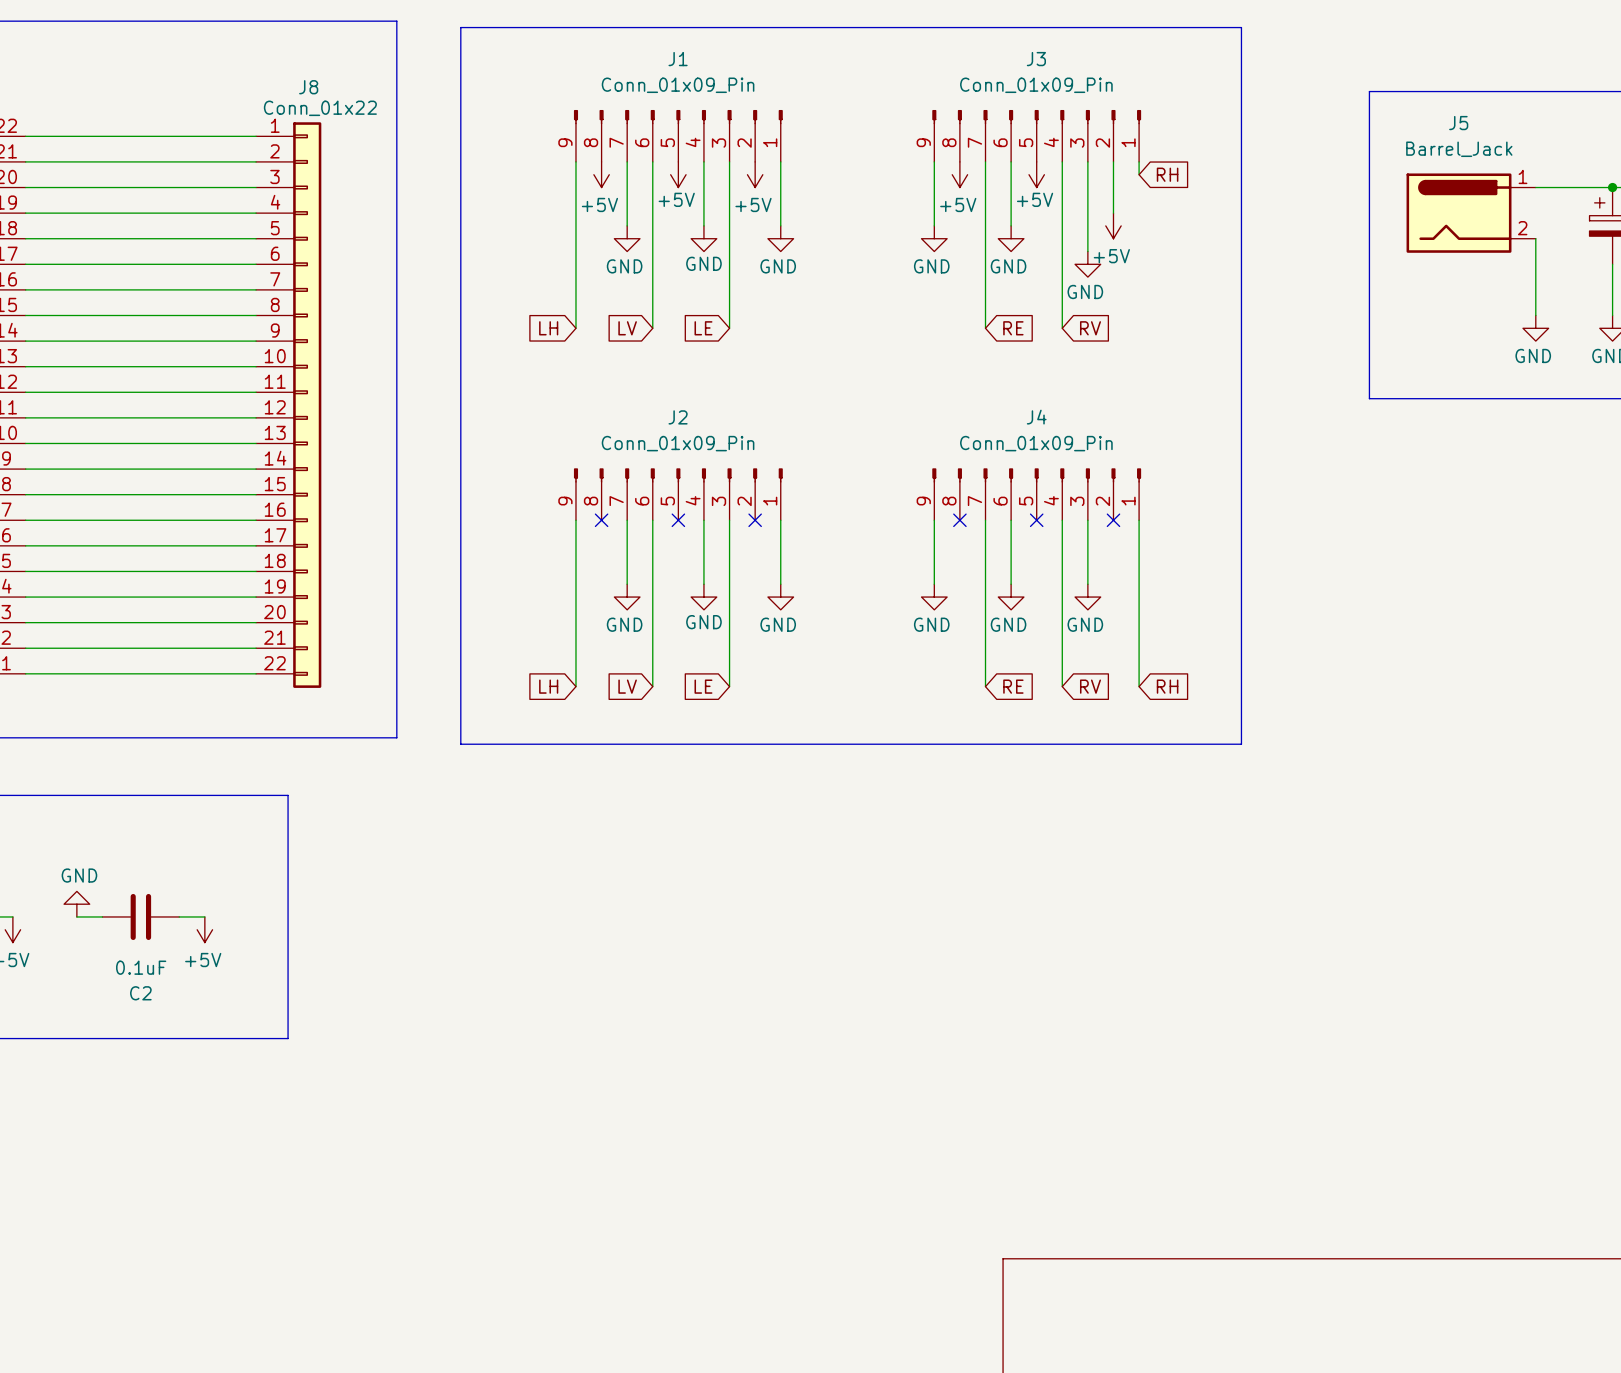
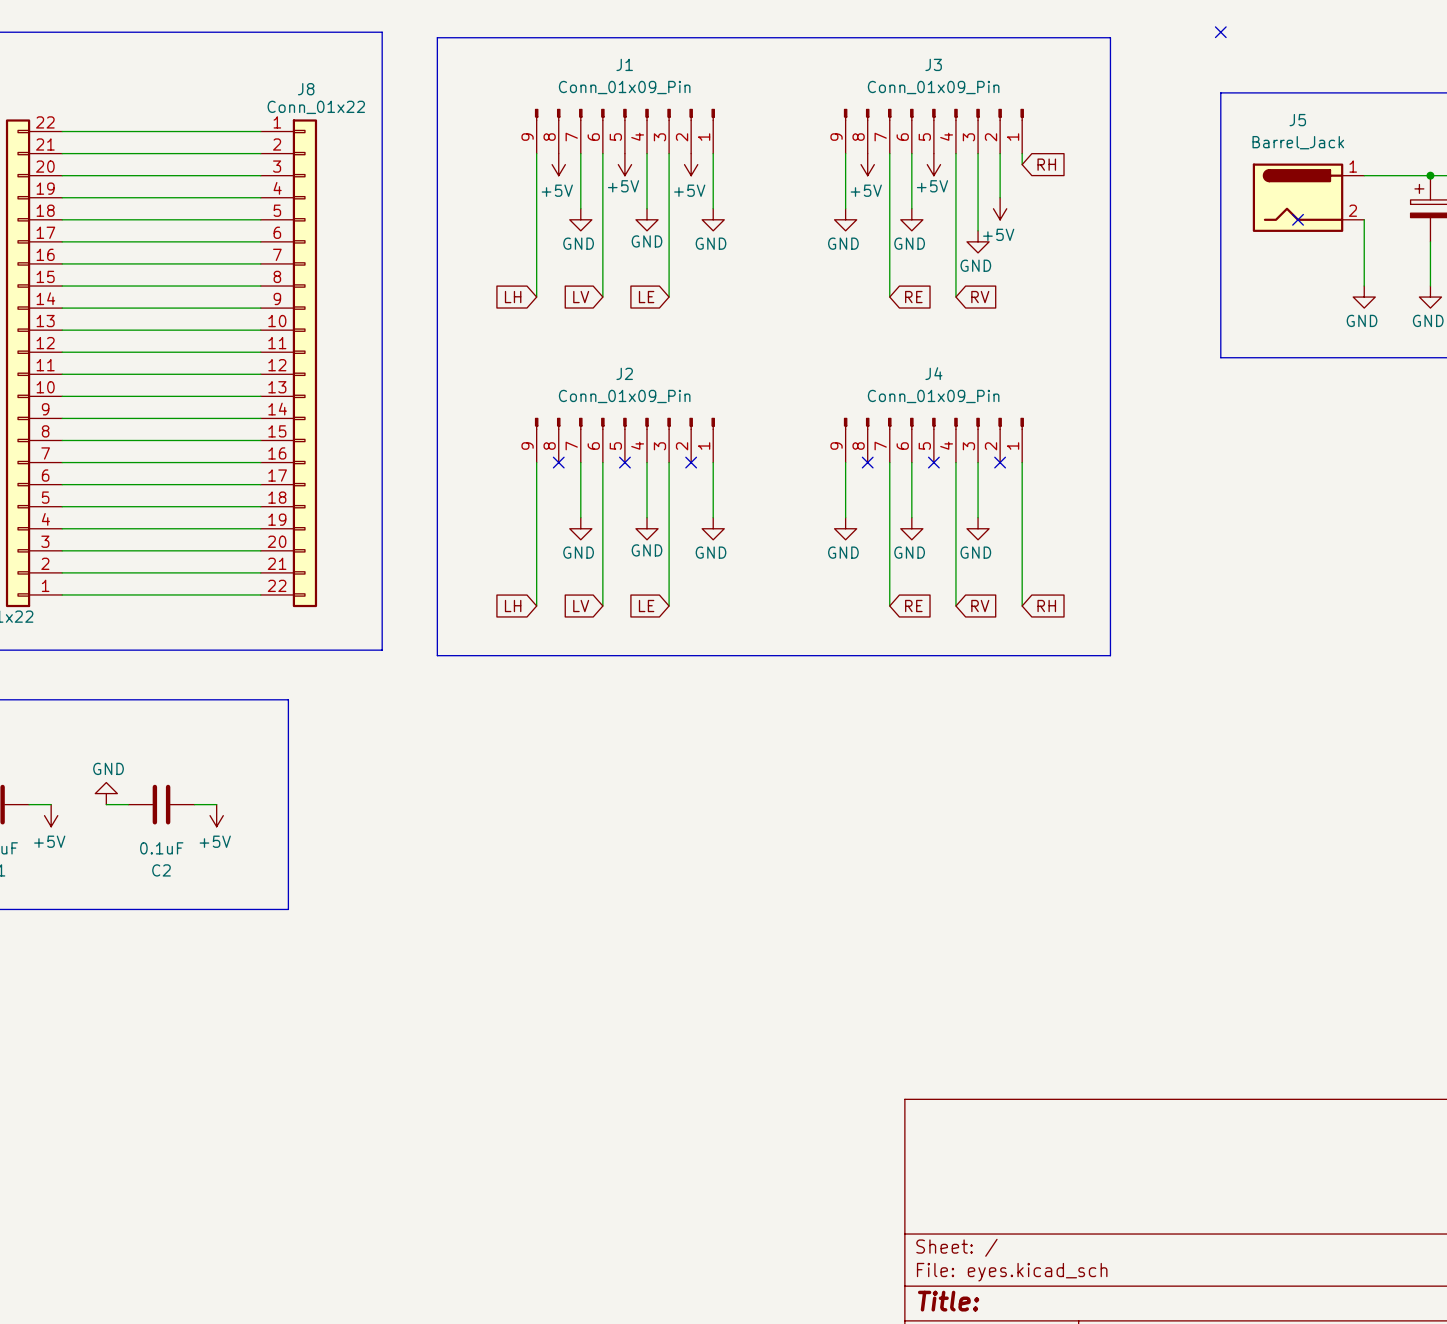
no-connect mark: none -> (1220, 32)
no-connect mark: none -> (1298, 219)

